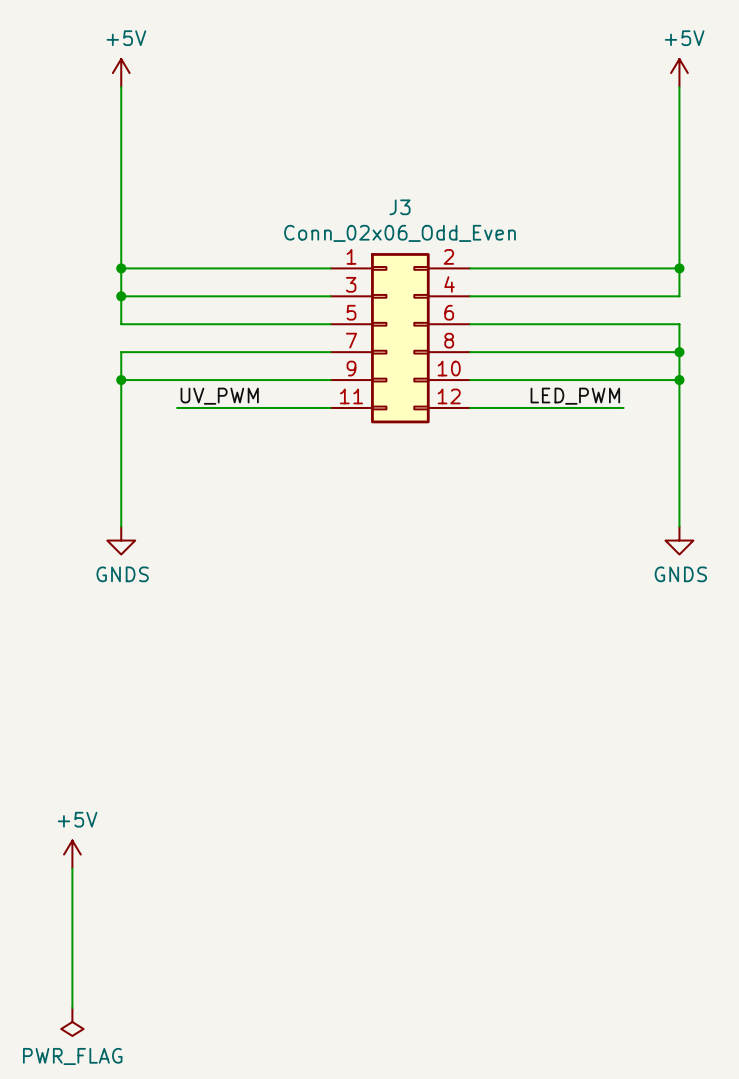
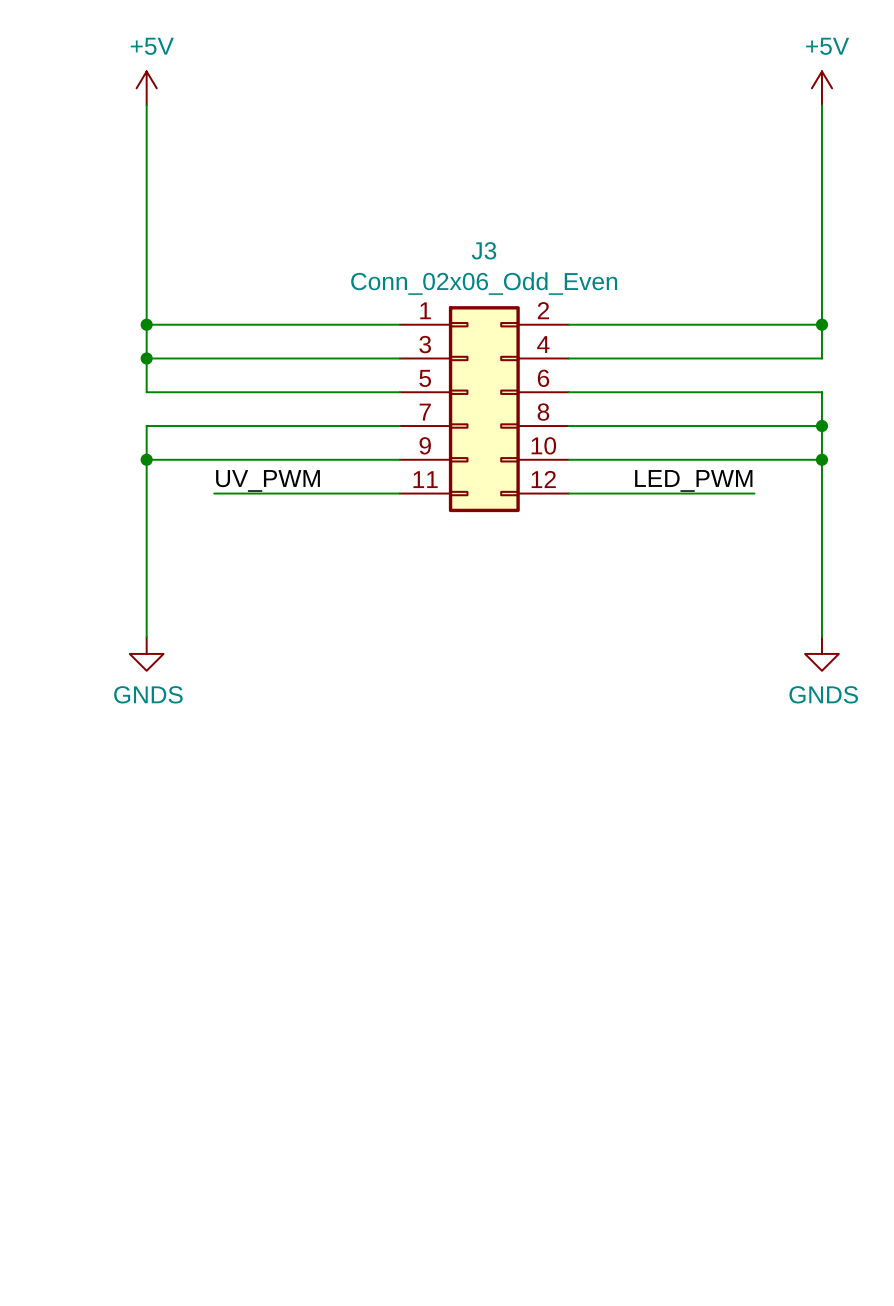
power symbol: +5V (72, 854) -> none
wire: (72, 868) (72, 1008) -> none
power symbol: PWR_FLAG (72, 1022) -> none

